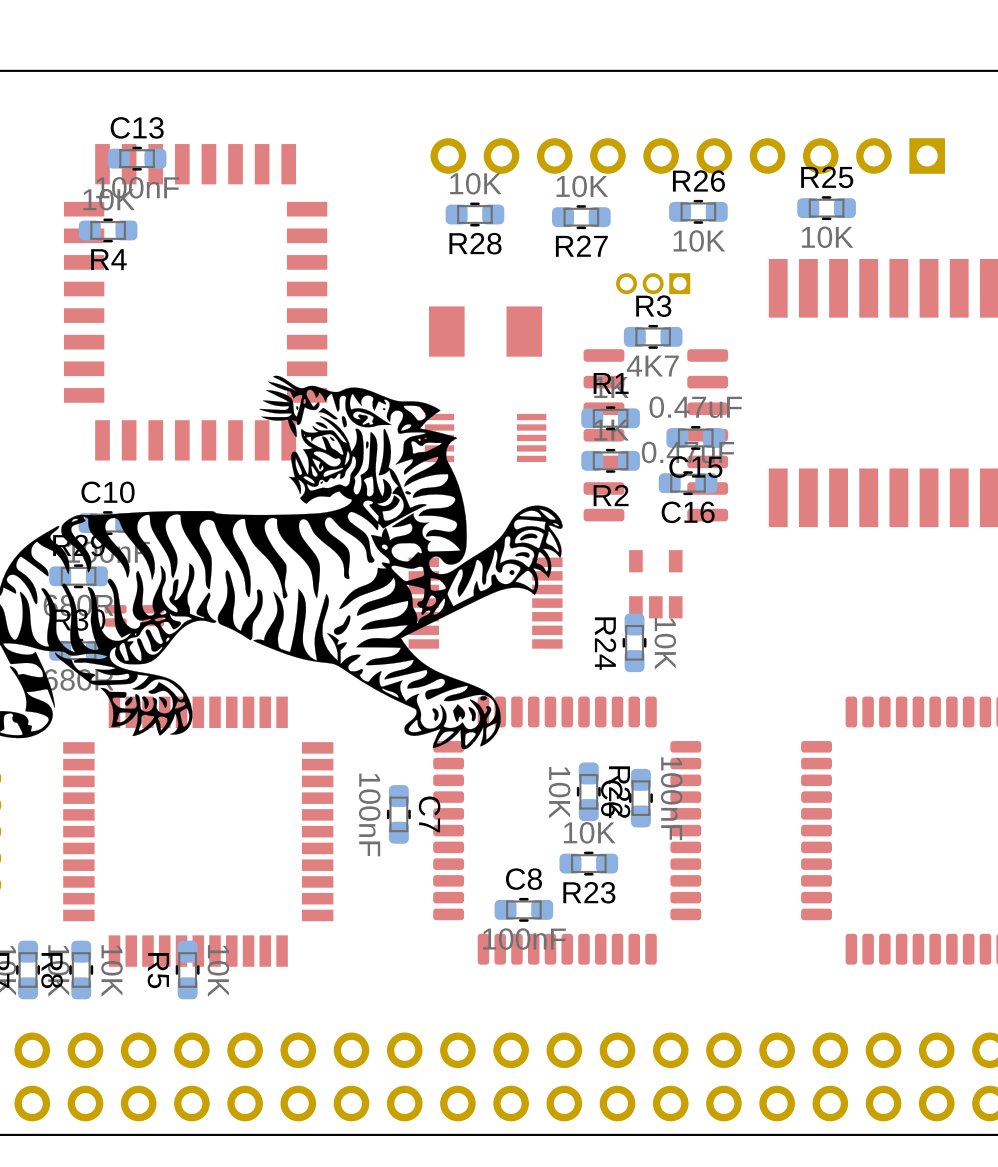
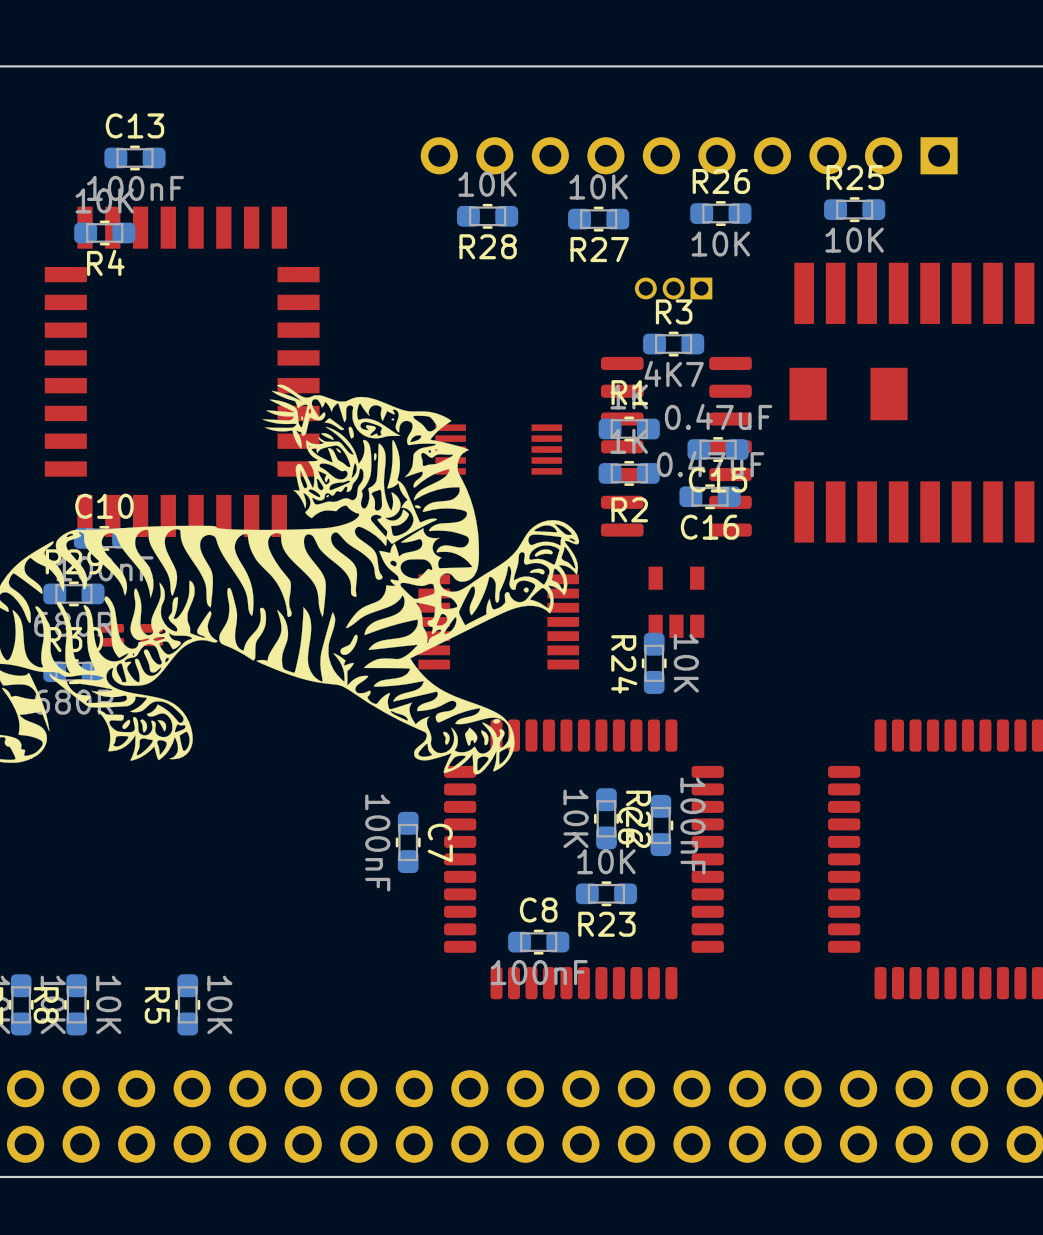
part position: (687, 155) -> (689, 155)
part position: (195, 302) -> (182, 371)
part position: (485, 331) -> (848, 394)
part: (198, 831) -> none

